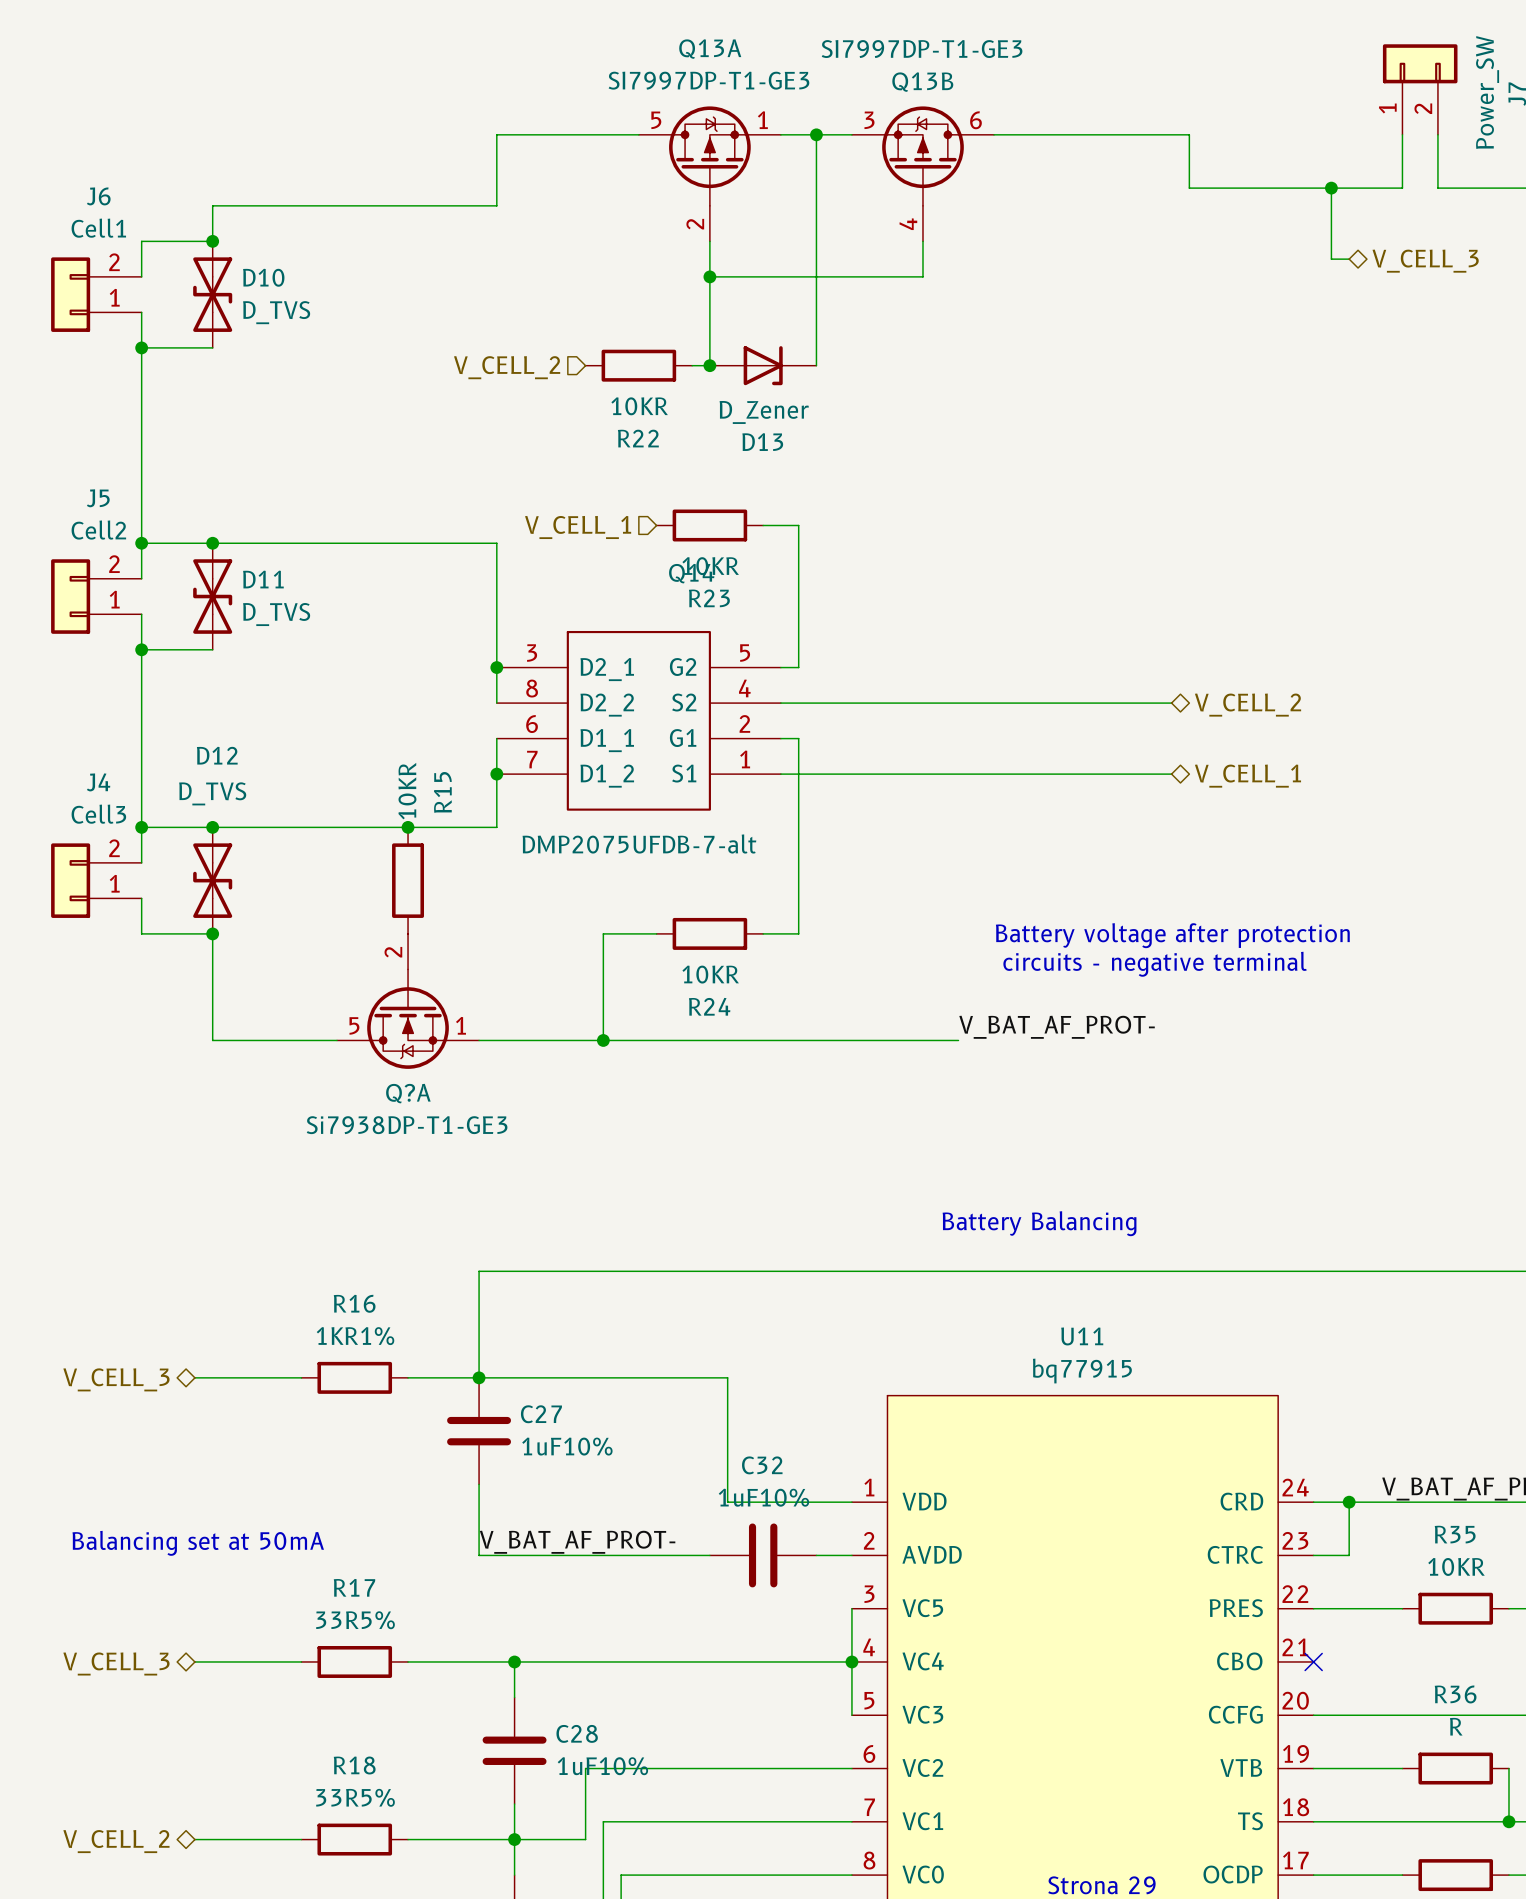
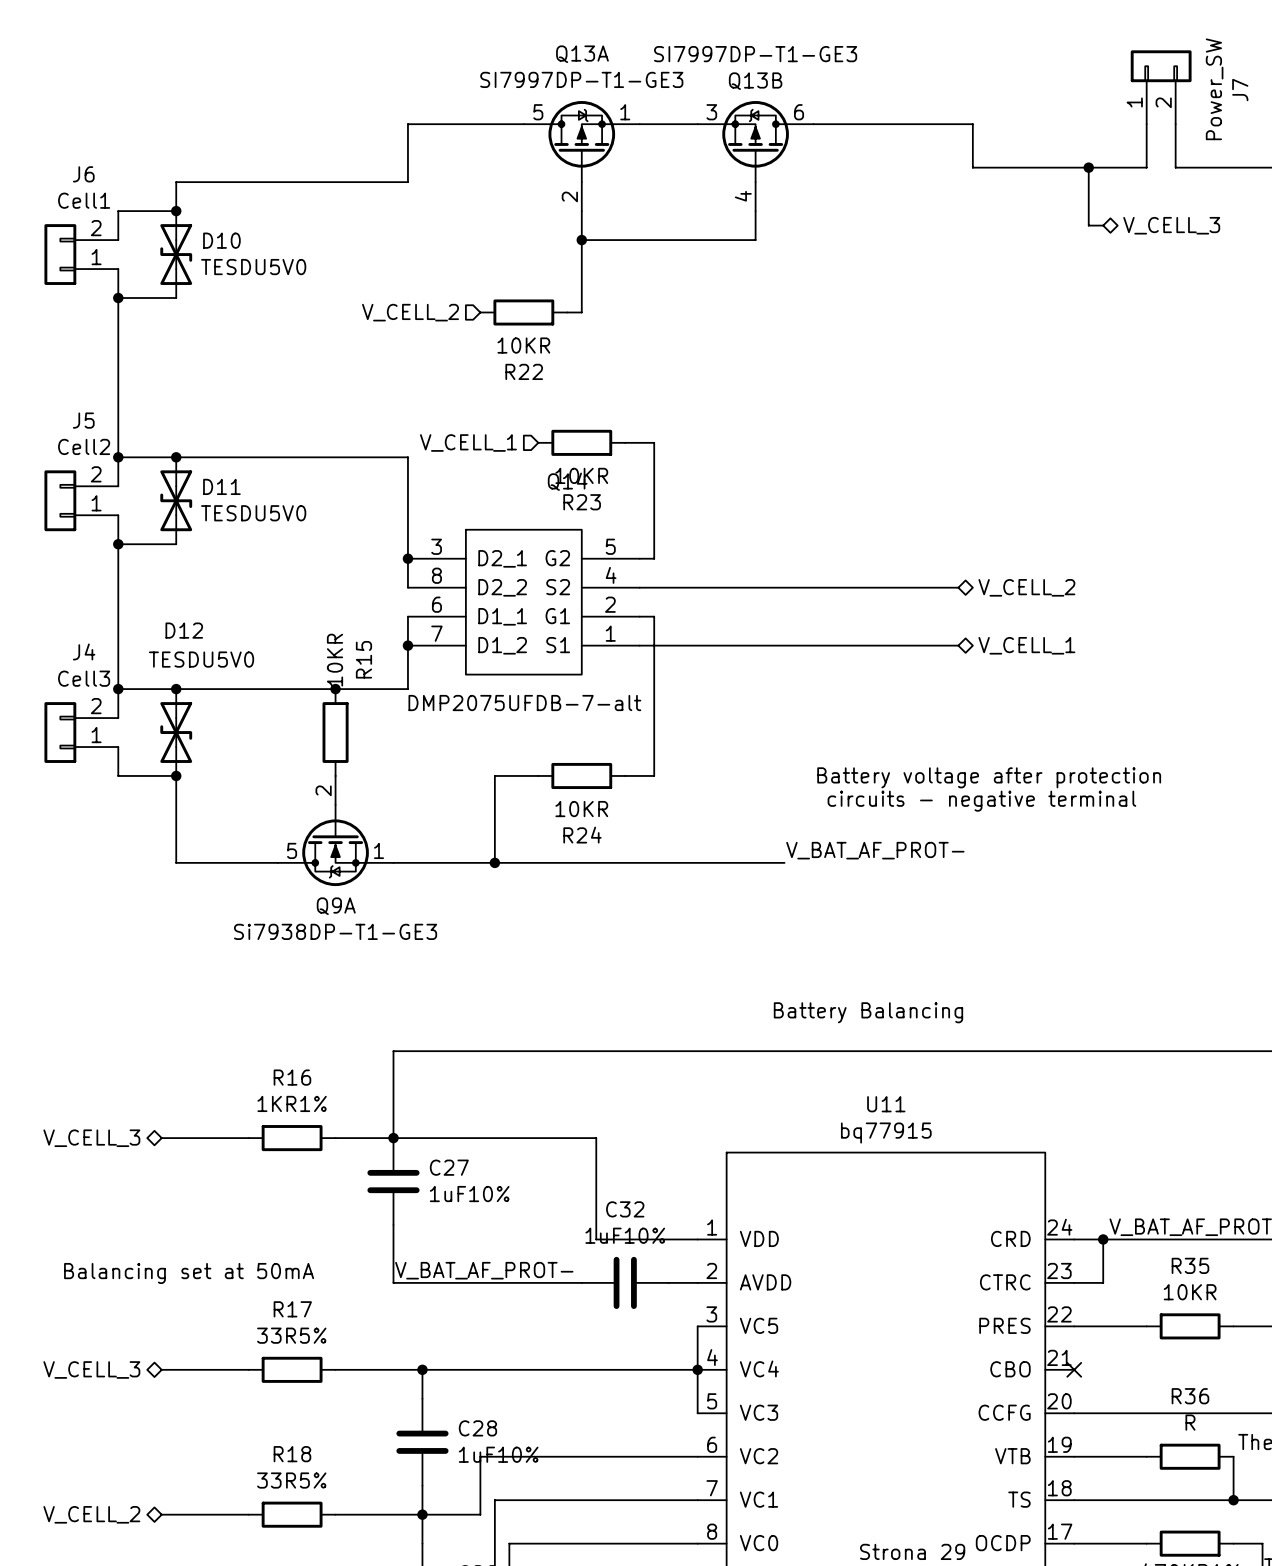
wire: (816, 134) (816, 365) -> none
junction: (816, 134) -> none
D10 value: D_TVS (276, 312) -> TESDU5V0 (253, 267)
junction: (709, 365) -> none
D13: D_Zener (763, 365) -> none
D11 value: D_TVS (276, 614) -> TESDU5V0 (253, 513)
D12 value: D_TVS (212, 793) -> TESDU5V0 (201, 659)
Q?A name: Q?A (408, 1093) -> Q9A (336, 906)

